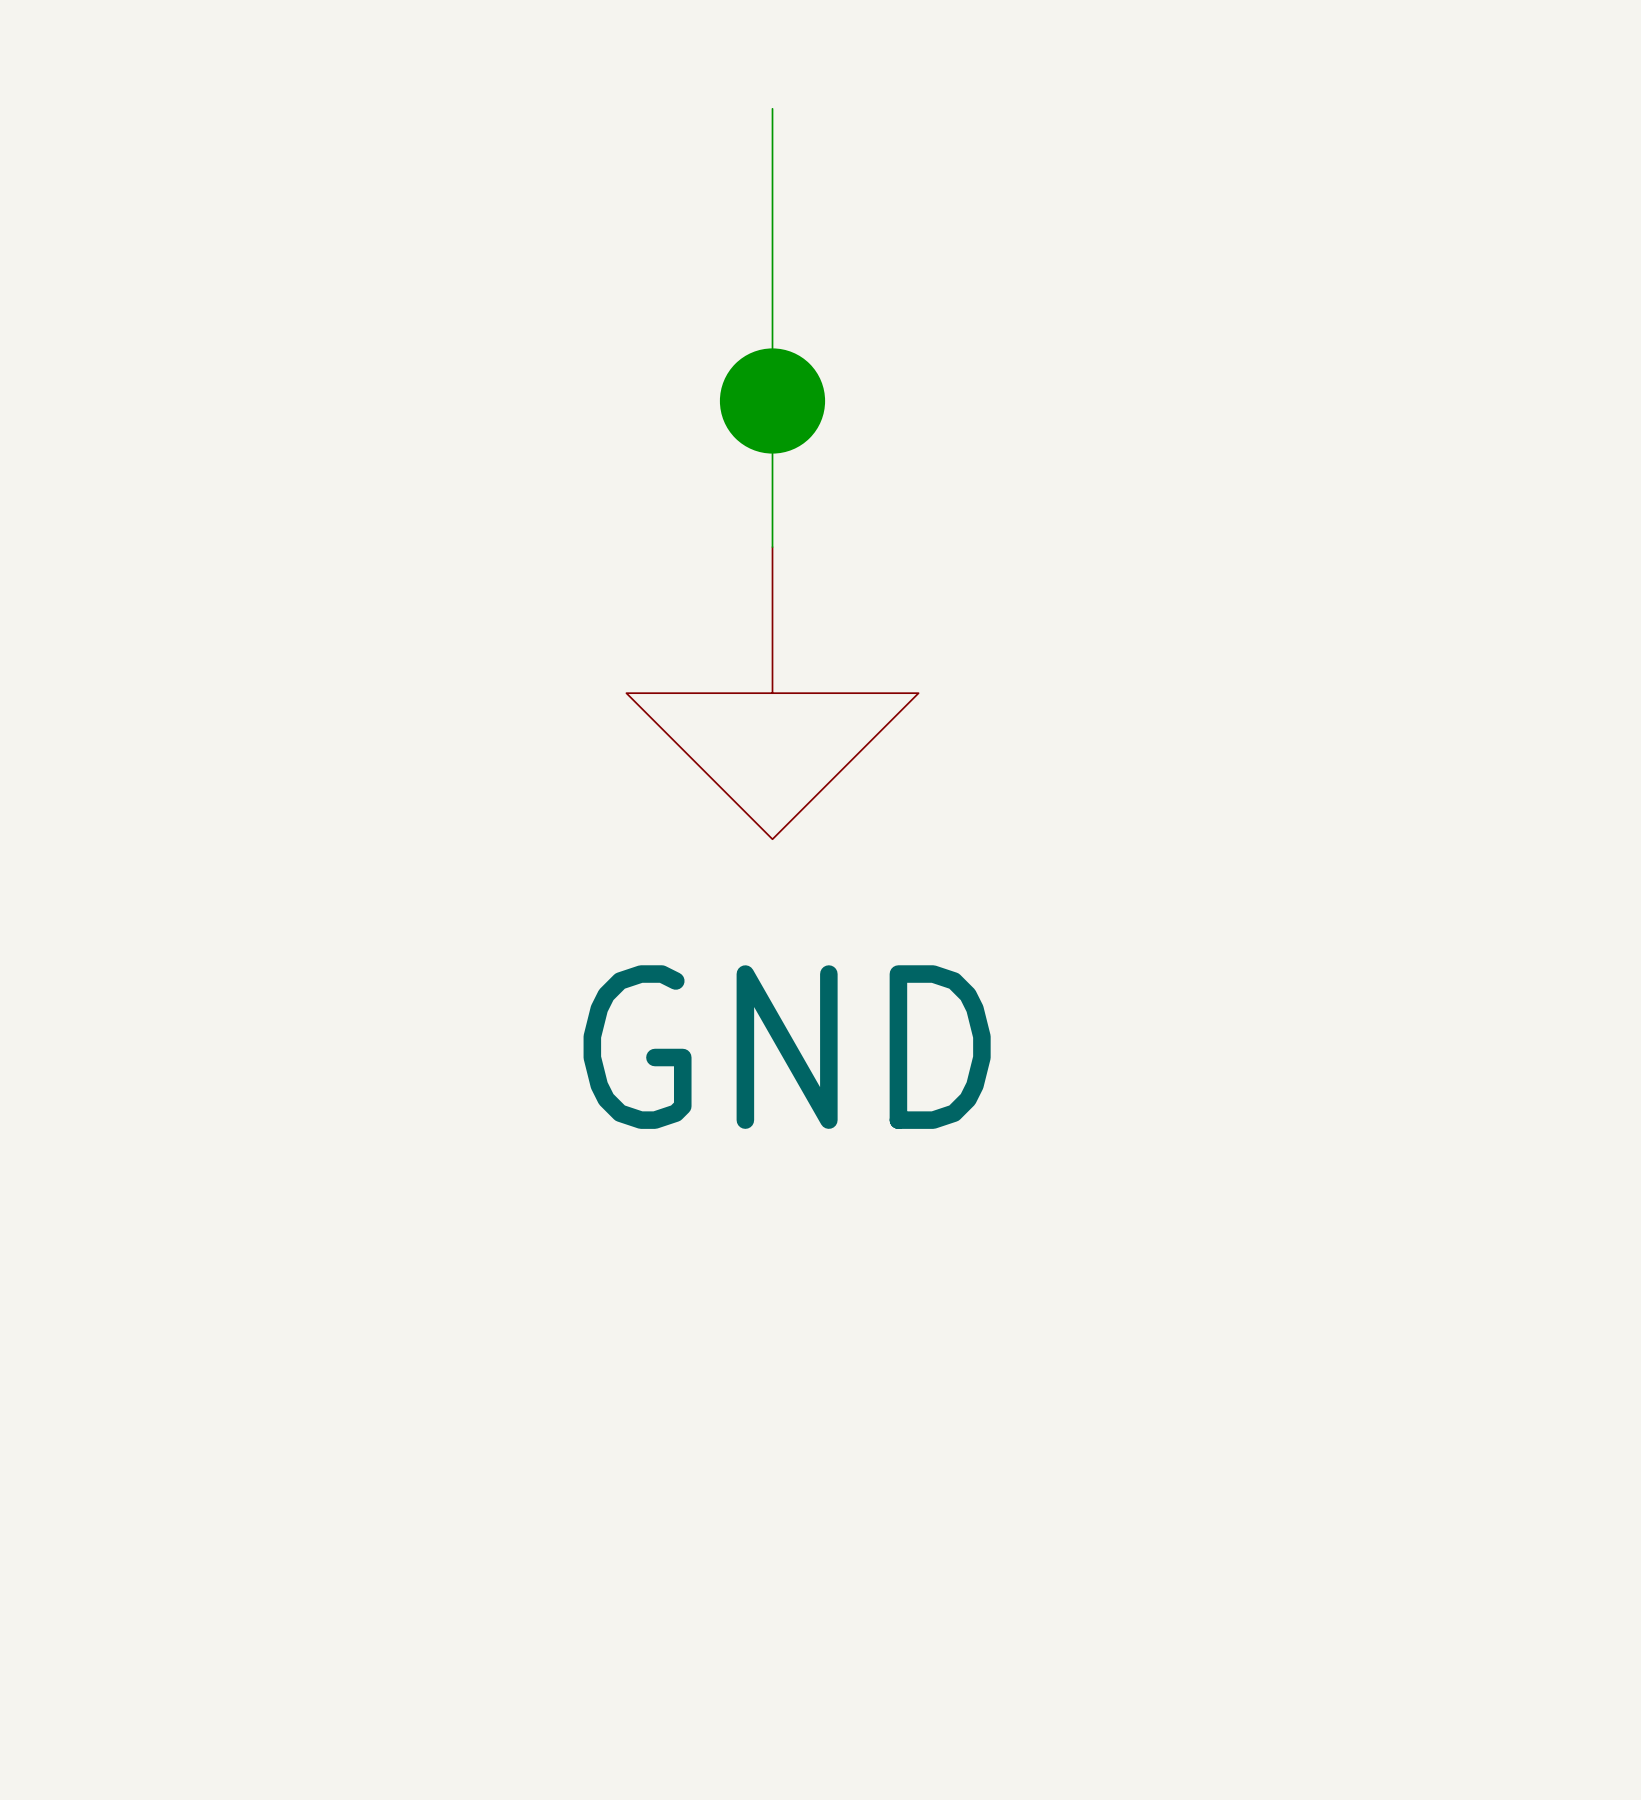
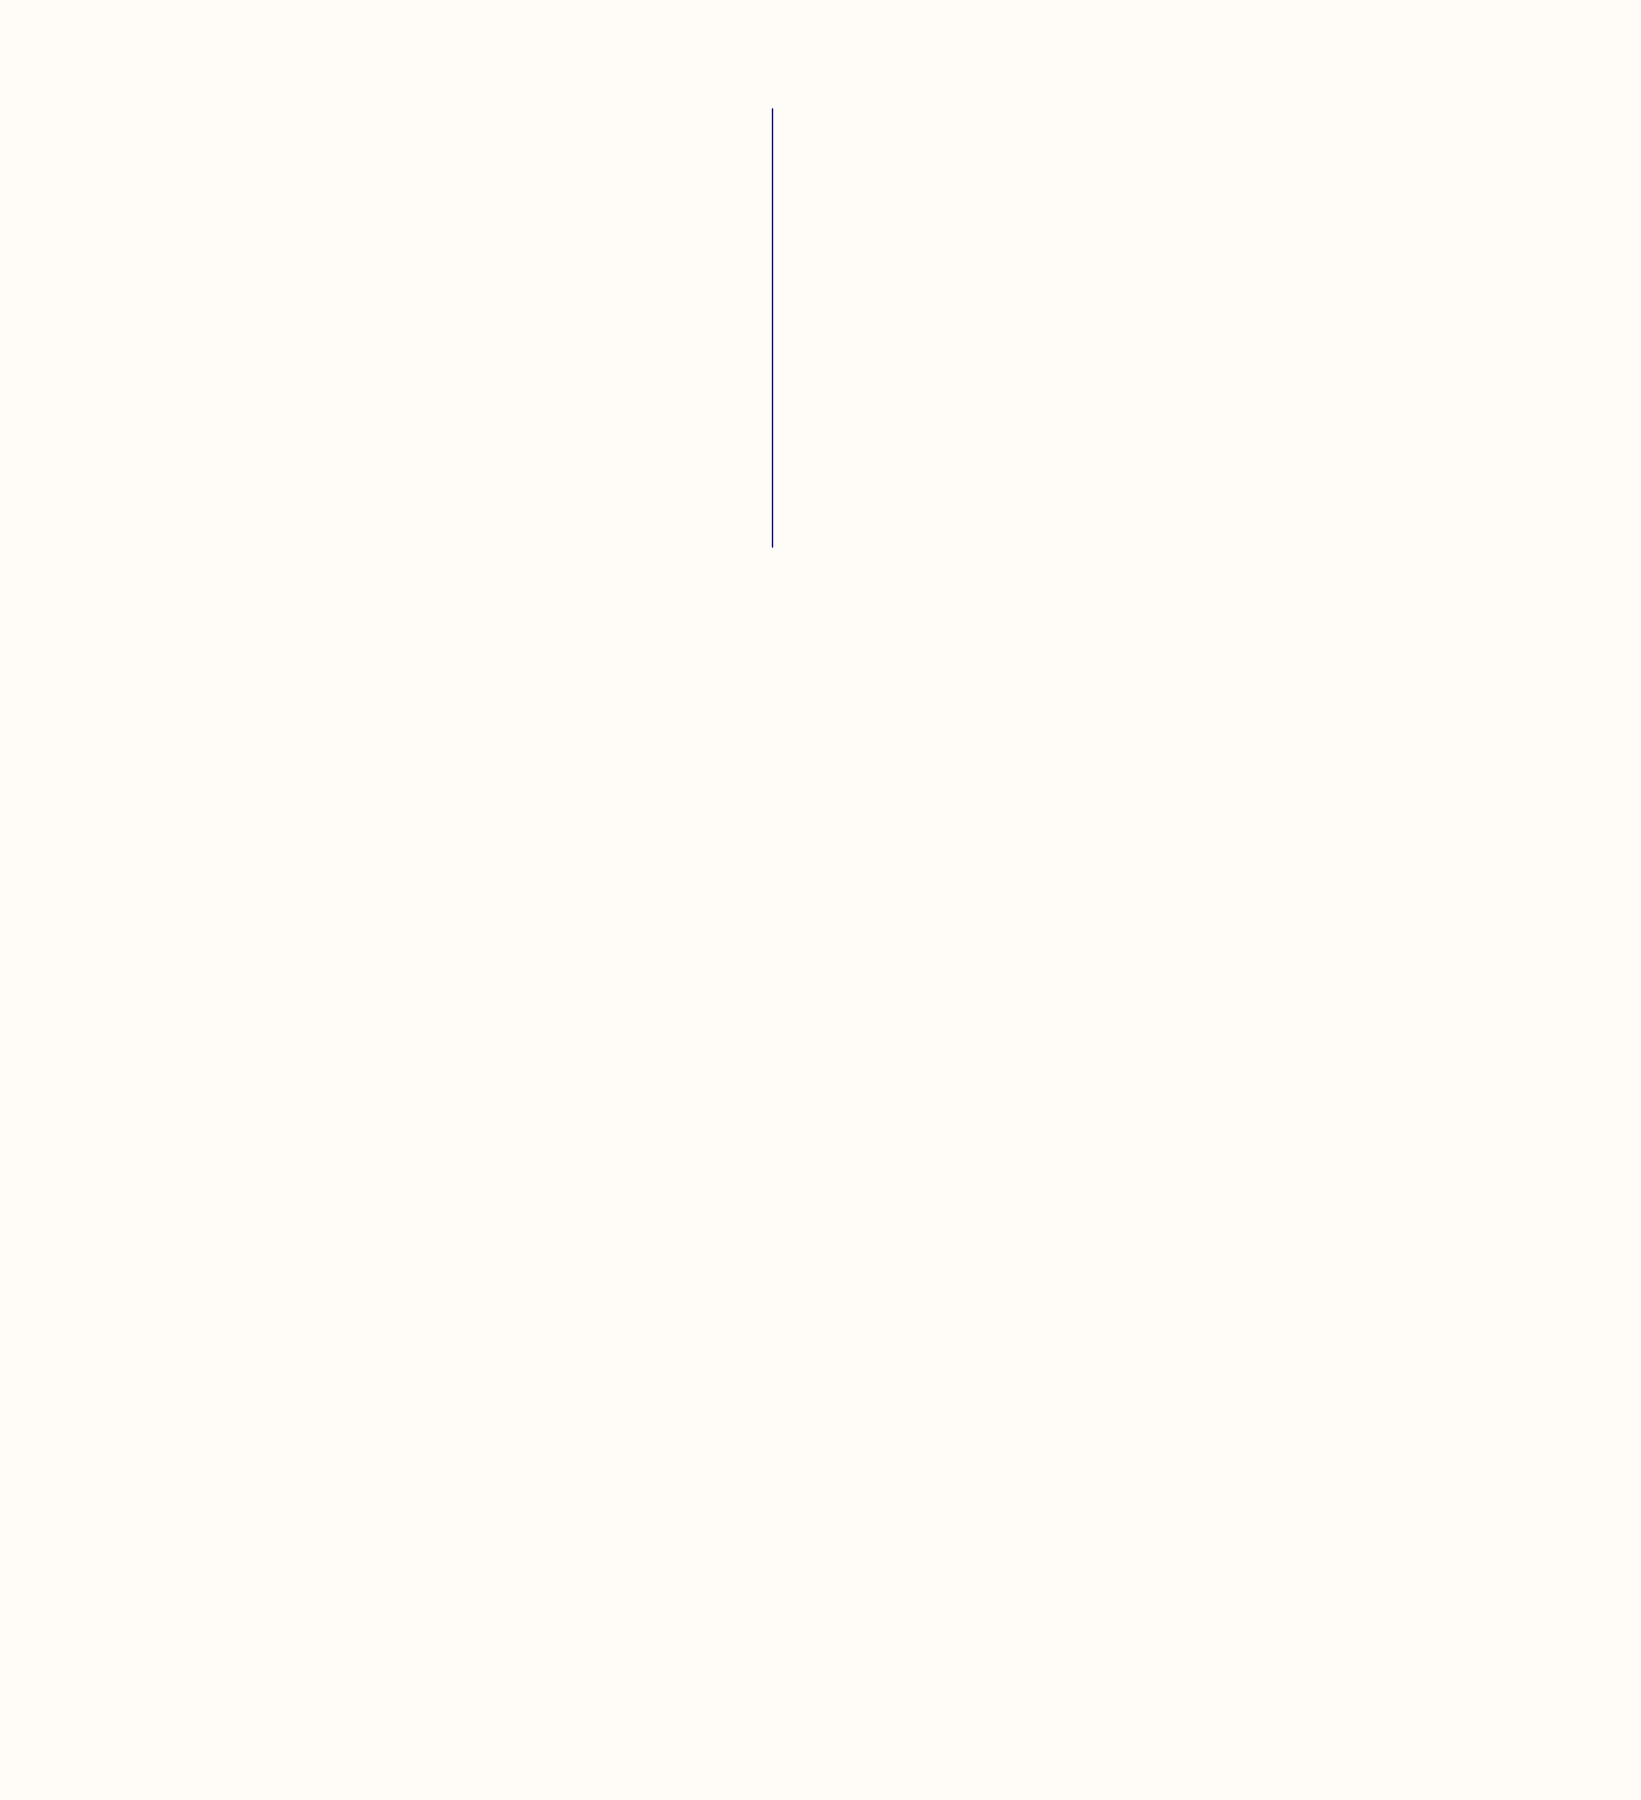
junction: (772, 400) -> none
power symbol: GND (772, 693) -> none

